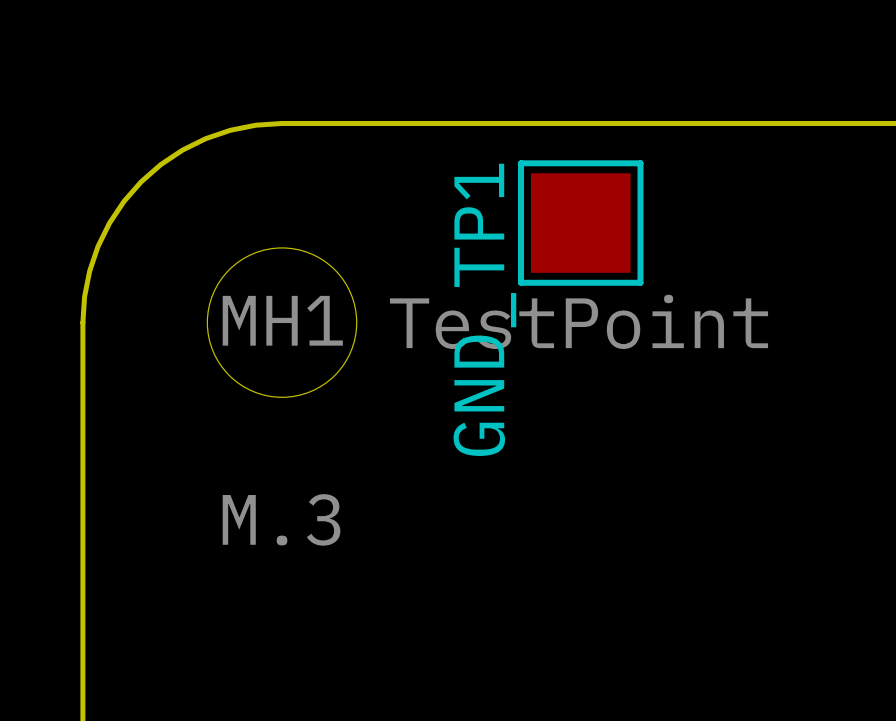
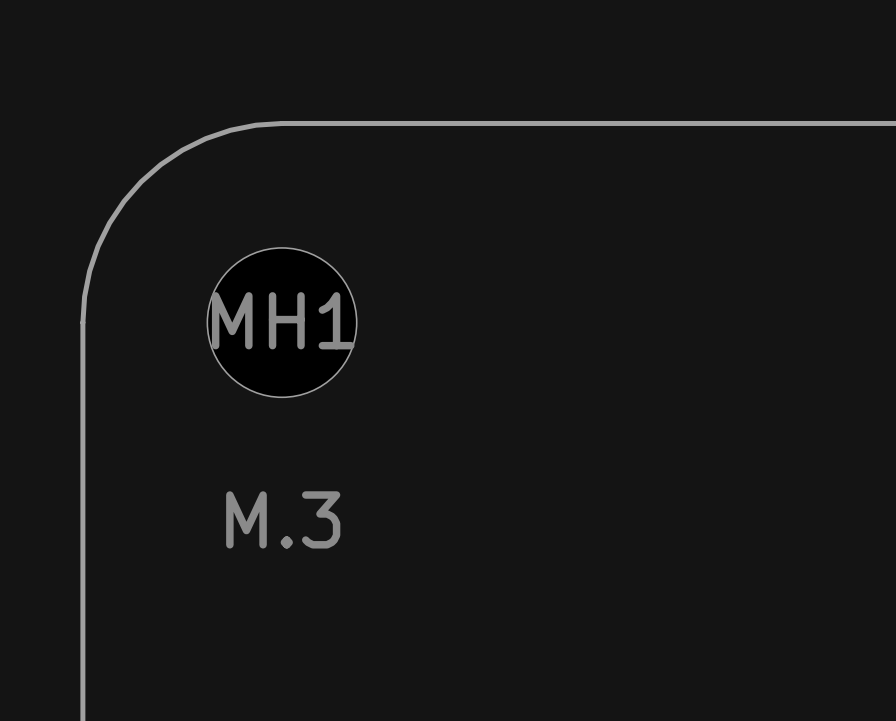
GND_TP1: TestPoint (580, 223) -> none

